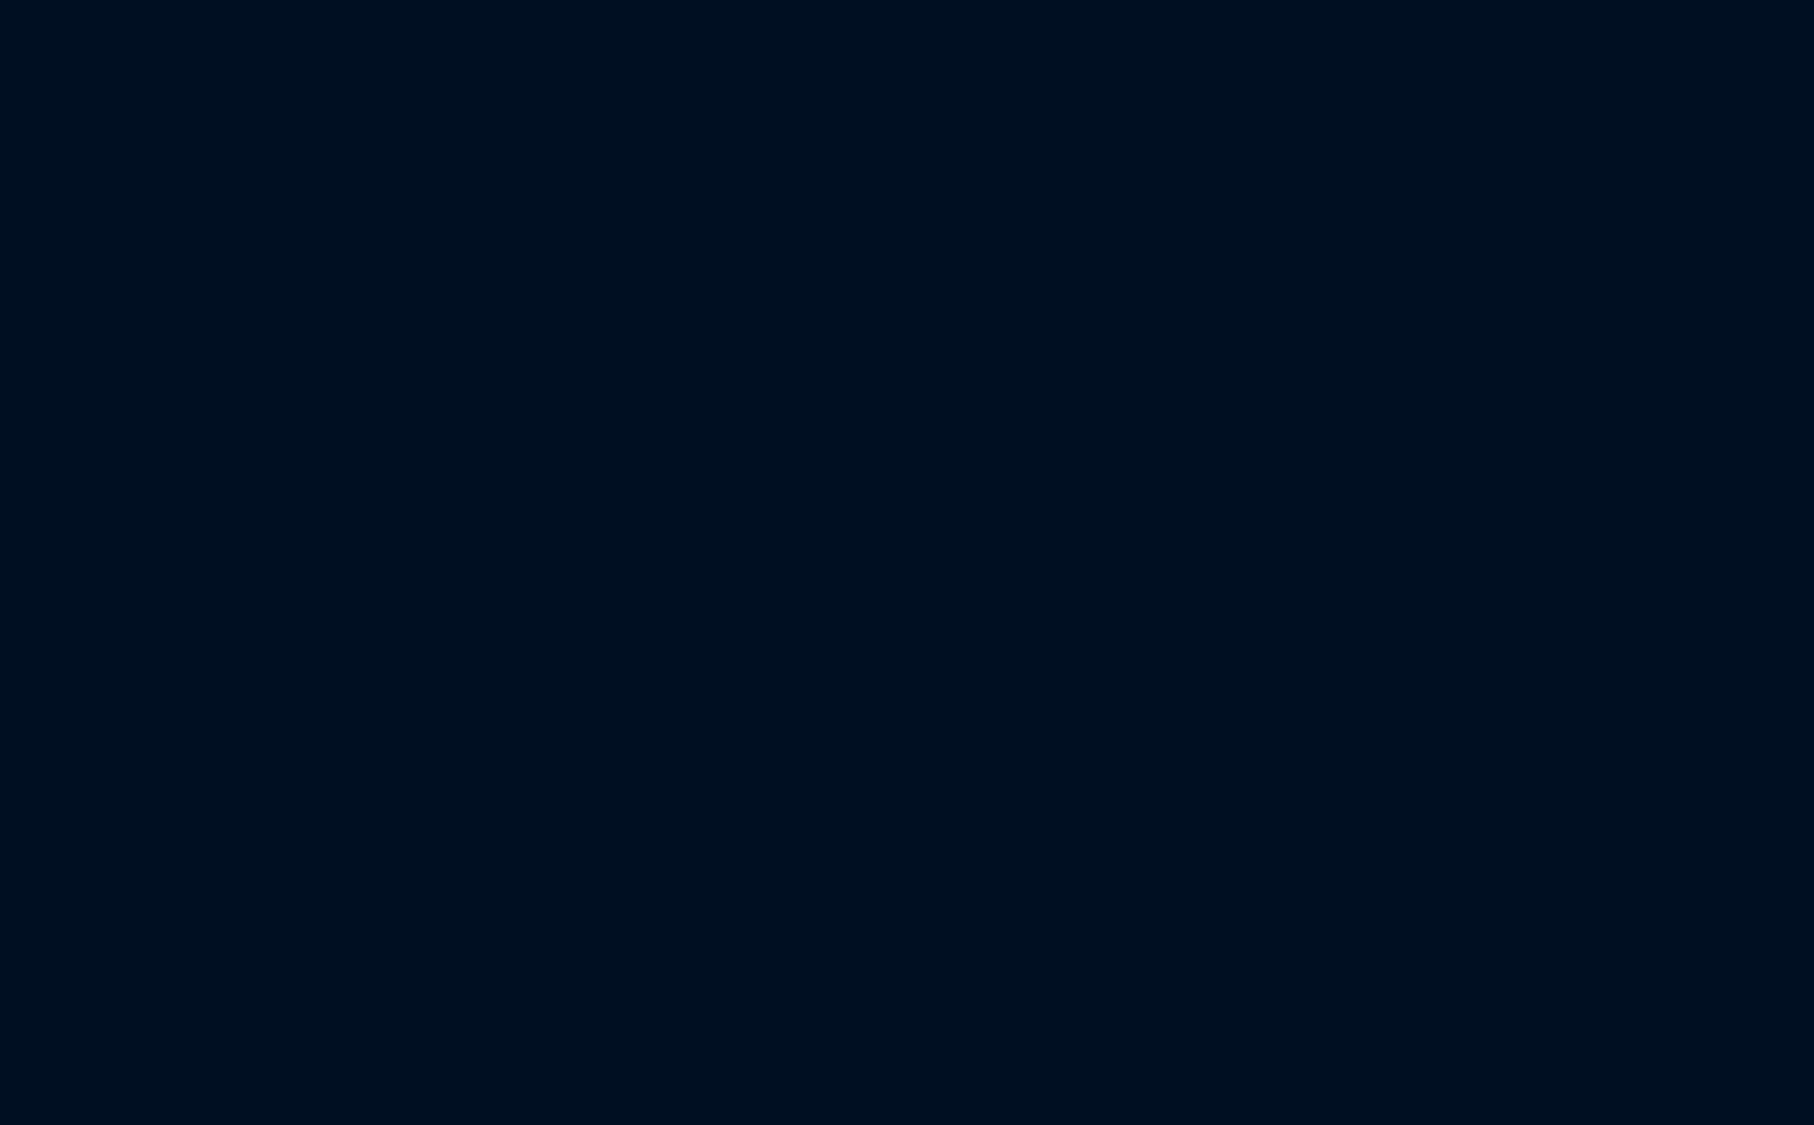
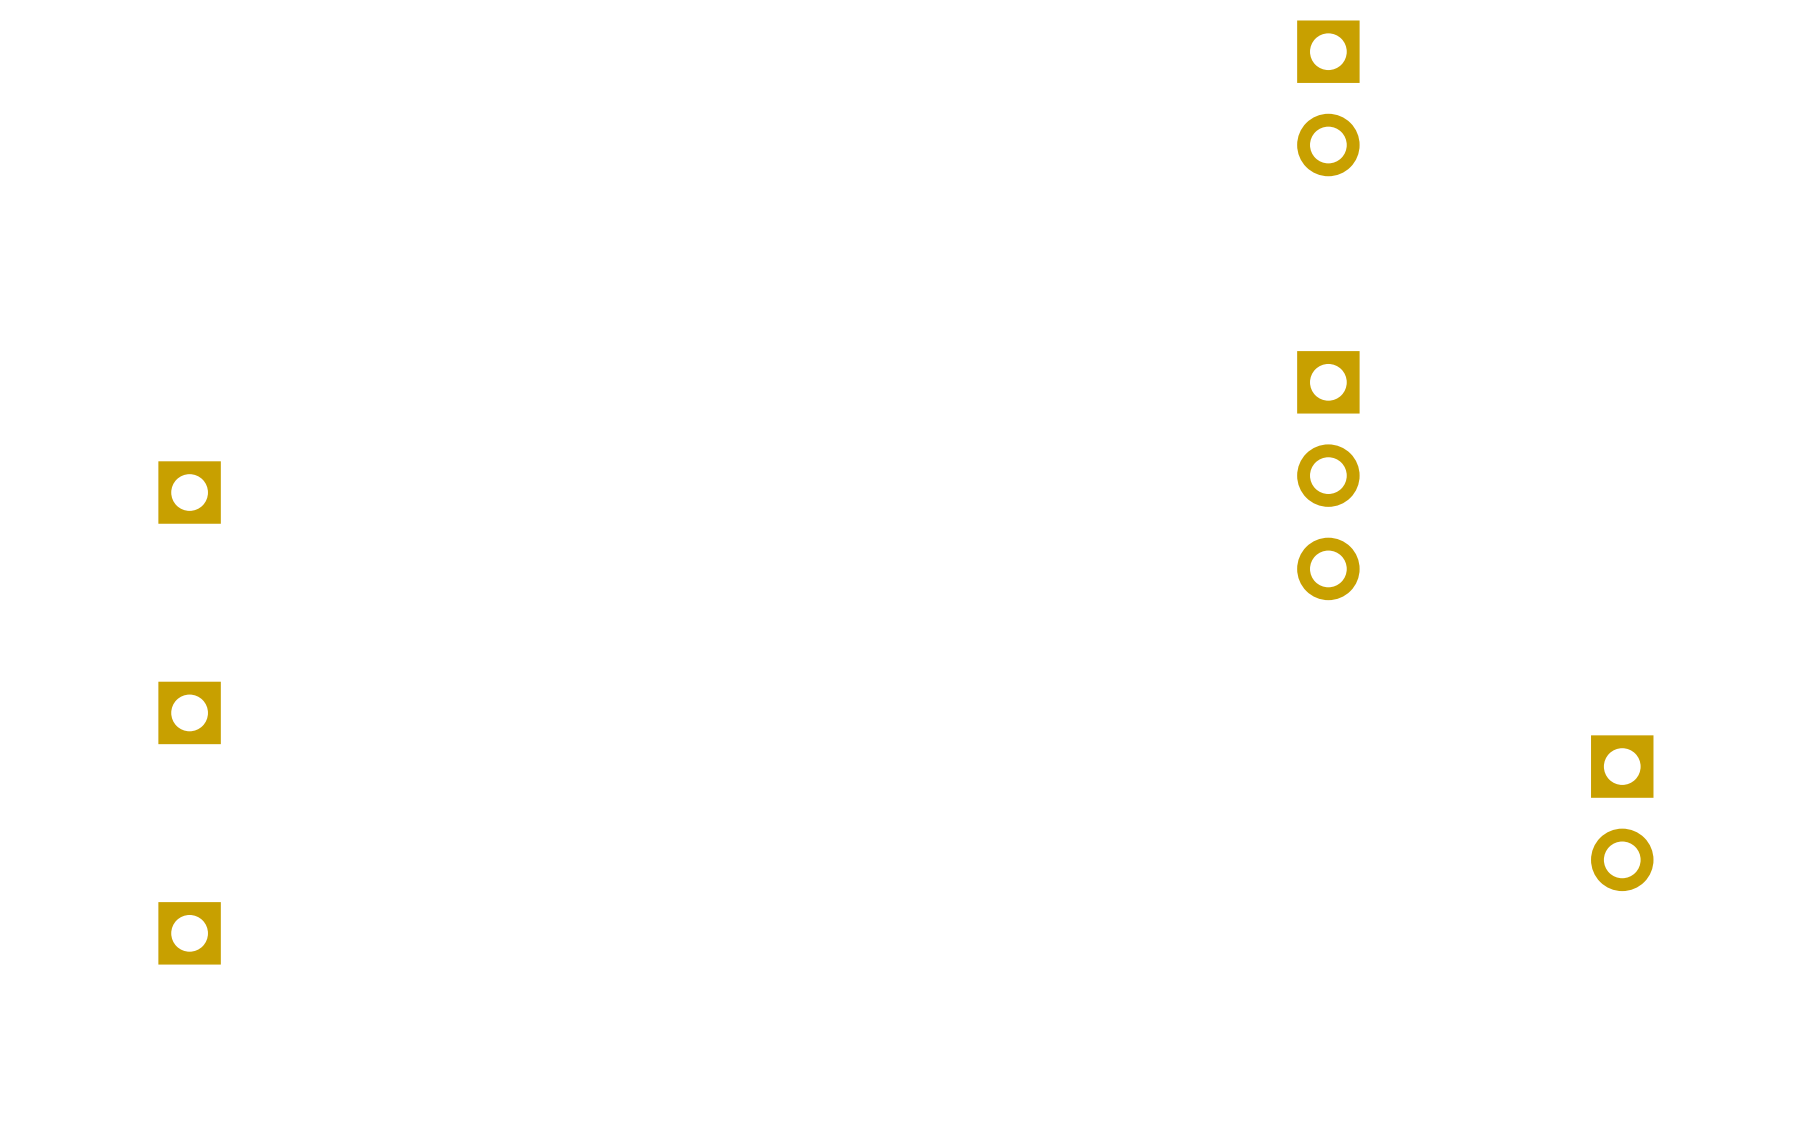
part: none -> (1328, 98)
part: none -> (1328, 475)
part: none -> (189, 492)
part: none -> (189, 712)
part: none -> (1622, 813)
part: none -> (189, 933)

